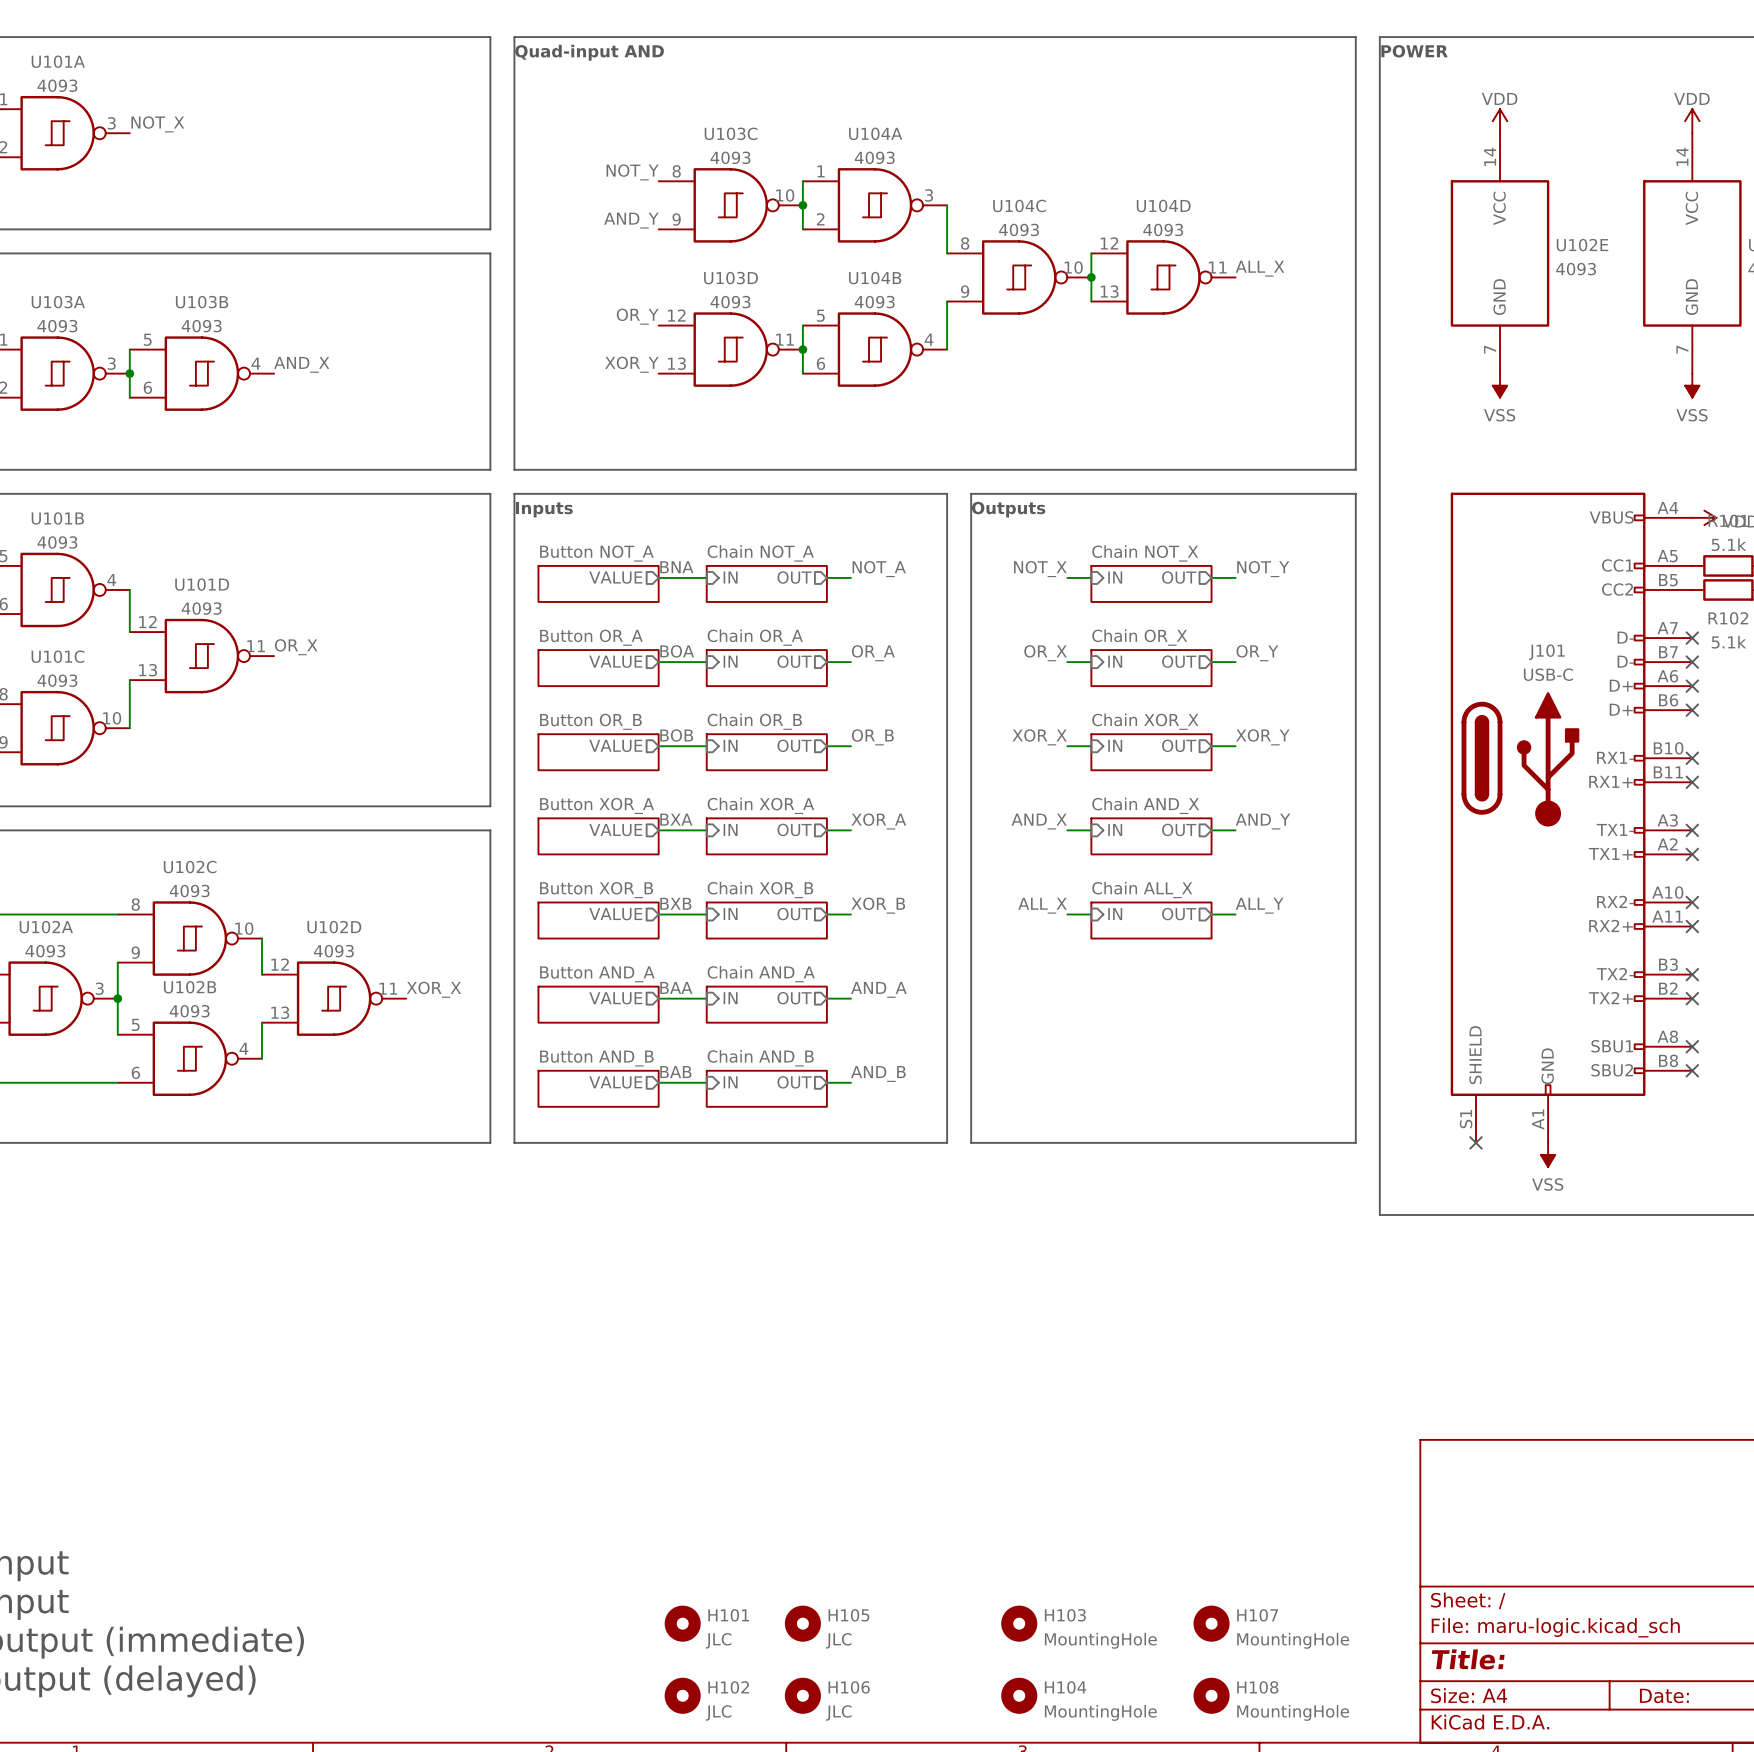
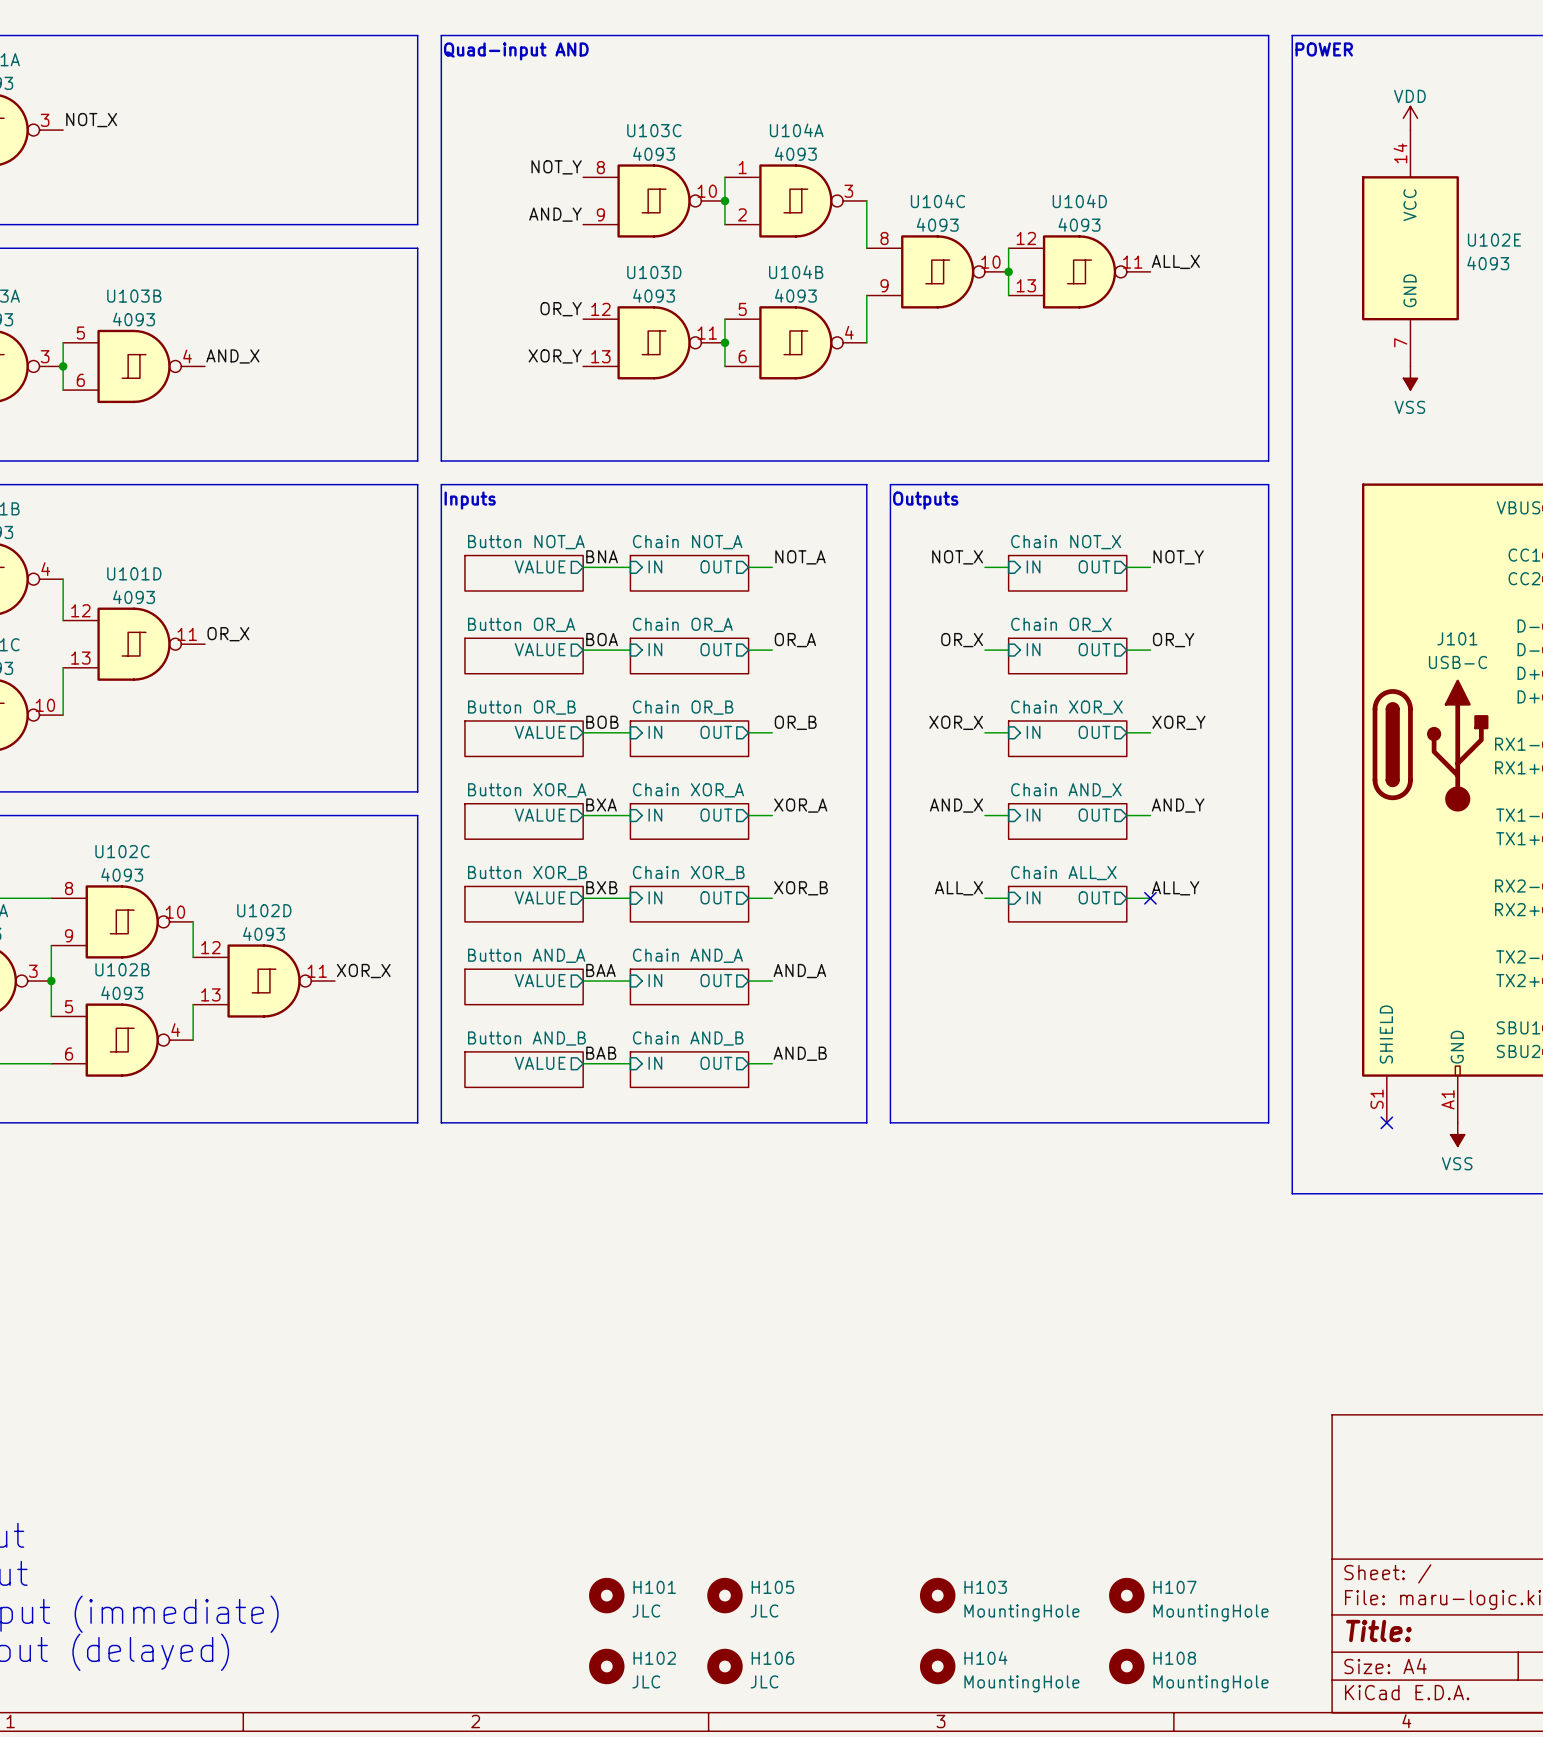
no-connect mark: none -> (1150, 898)

